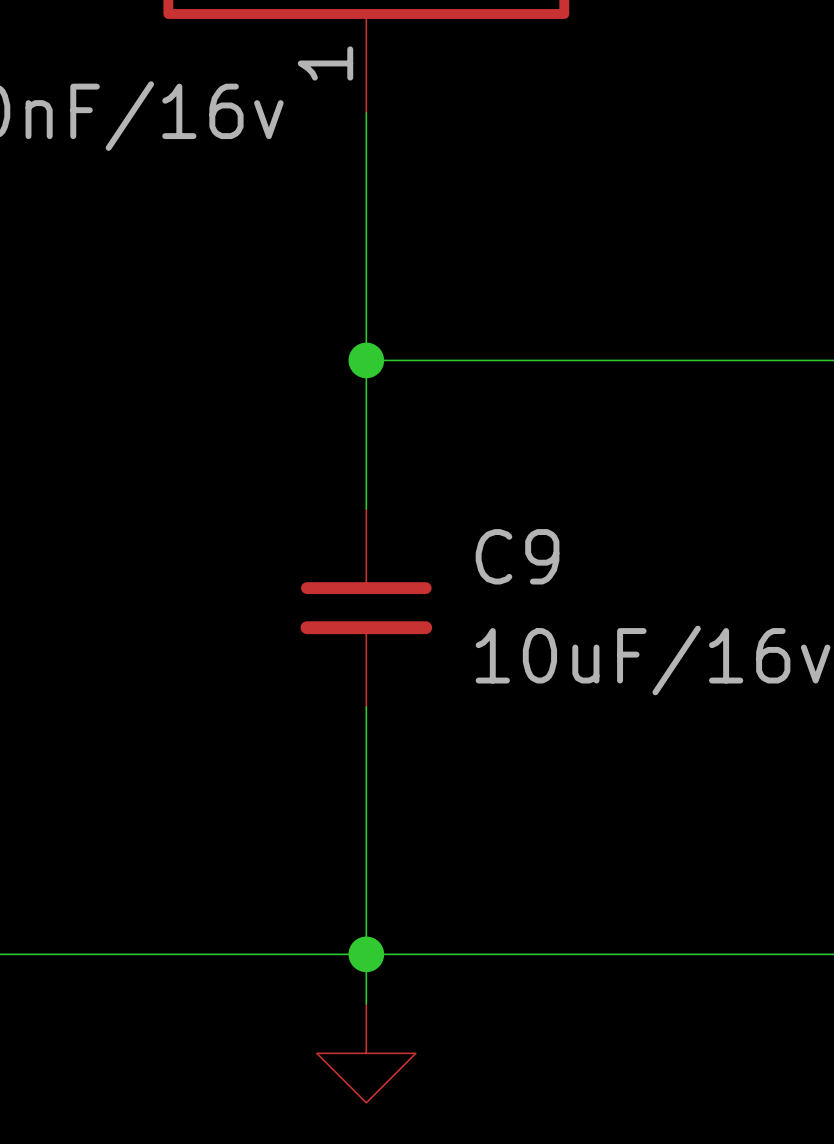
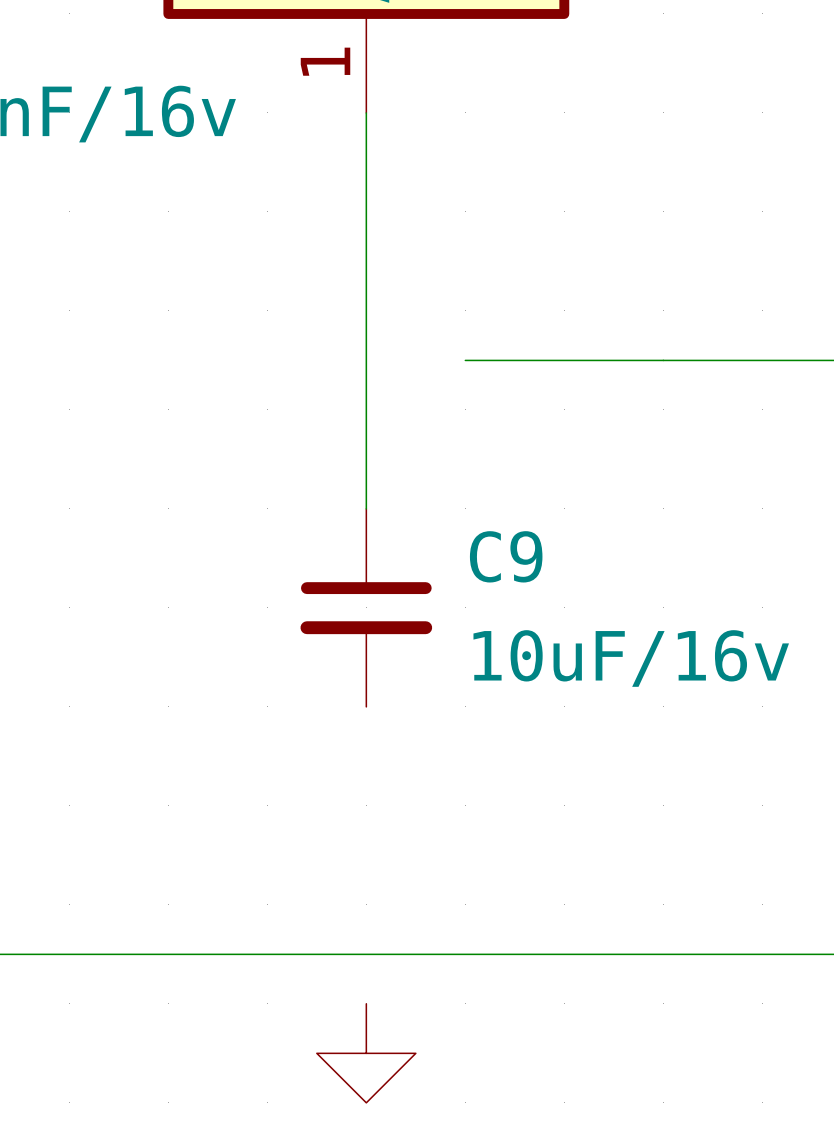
wire: (366, 360) (465, 360) -> none
junction: (366, 360) -> none
wire: (366, 706) (366, 1003) -> none
junction: (366, 954) -> none

